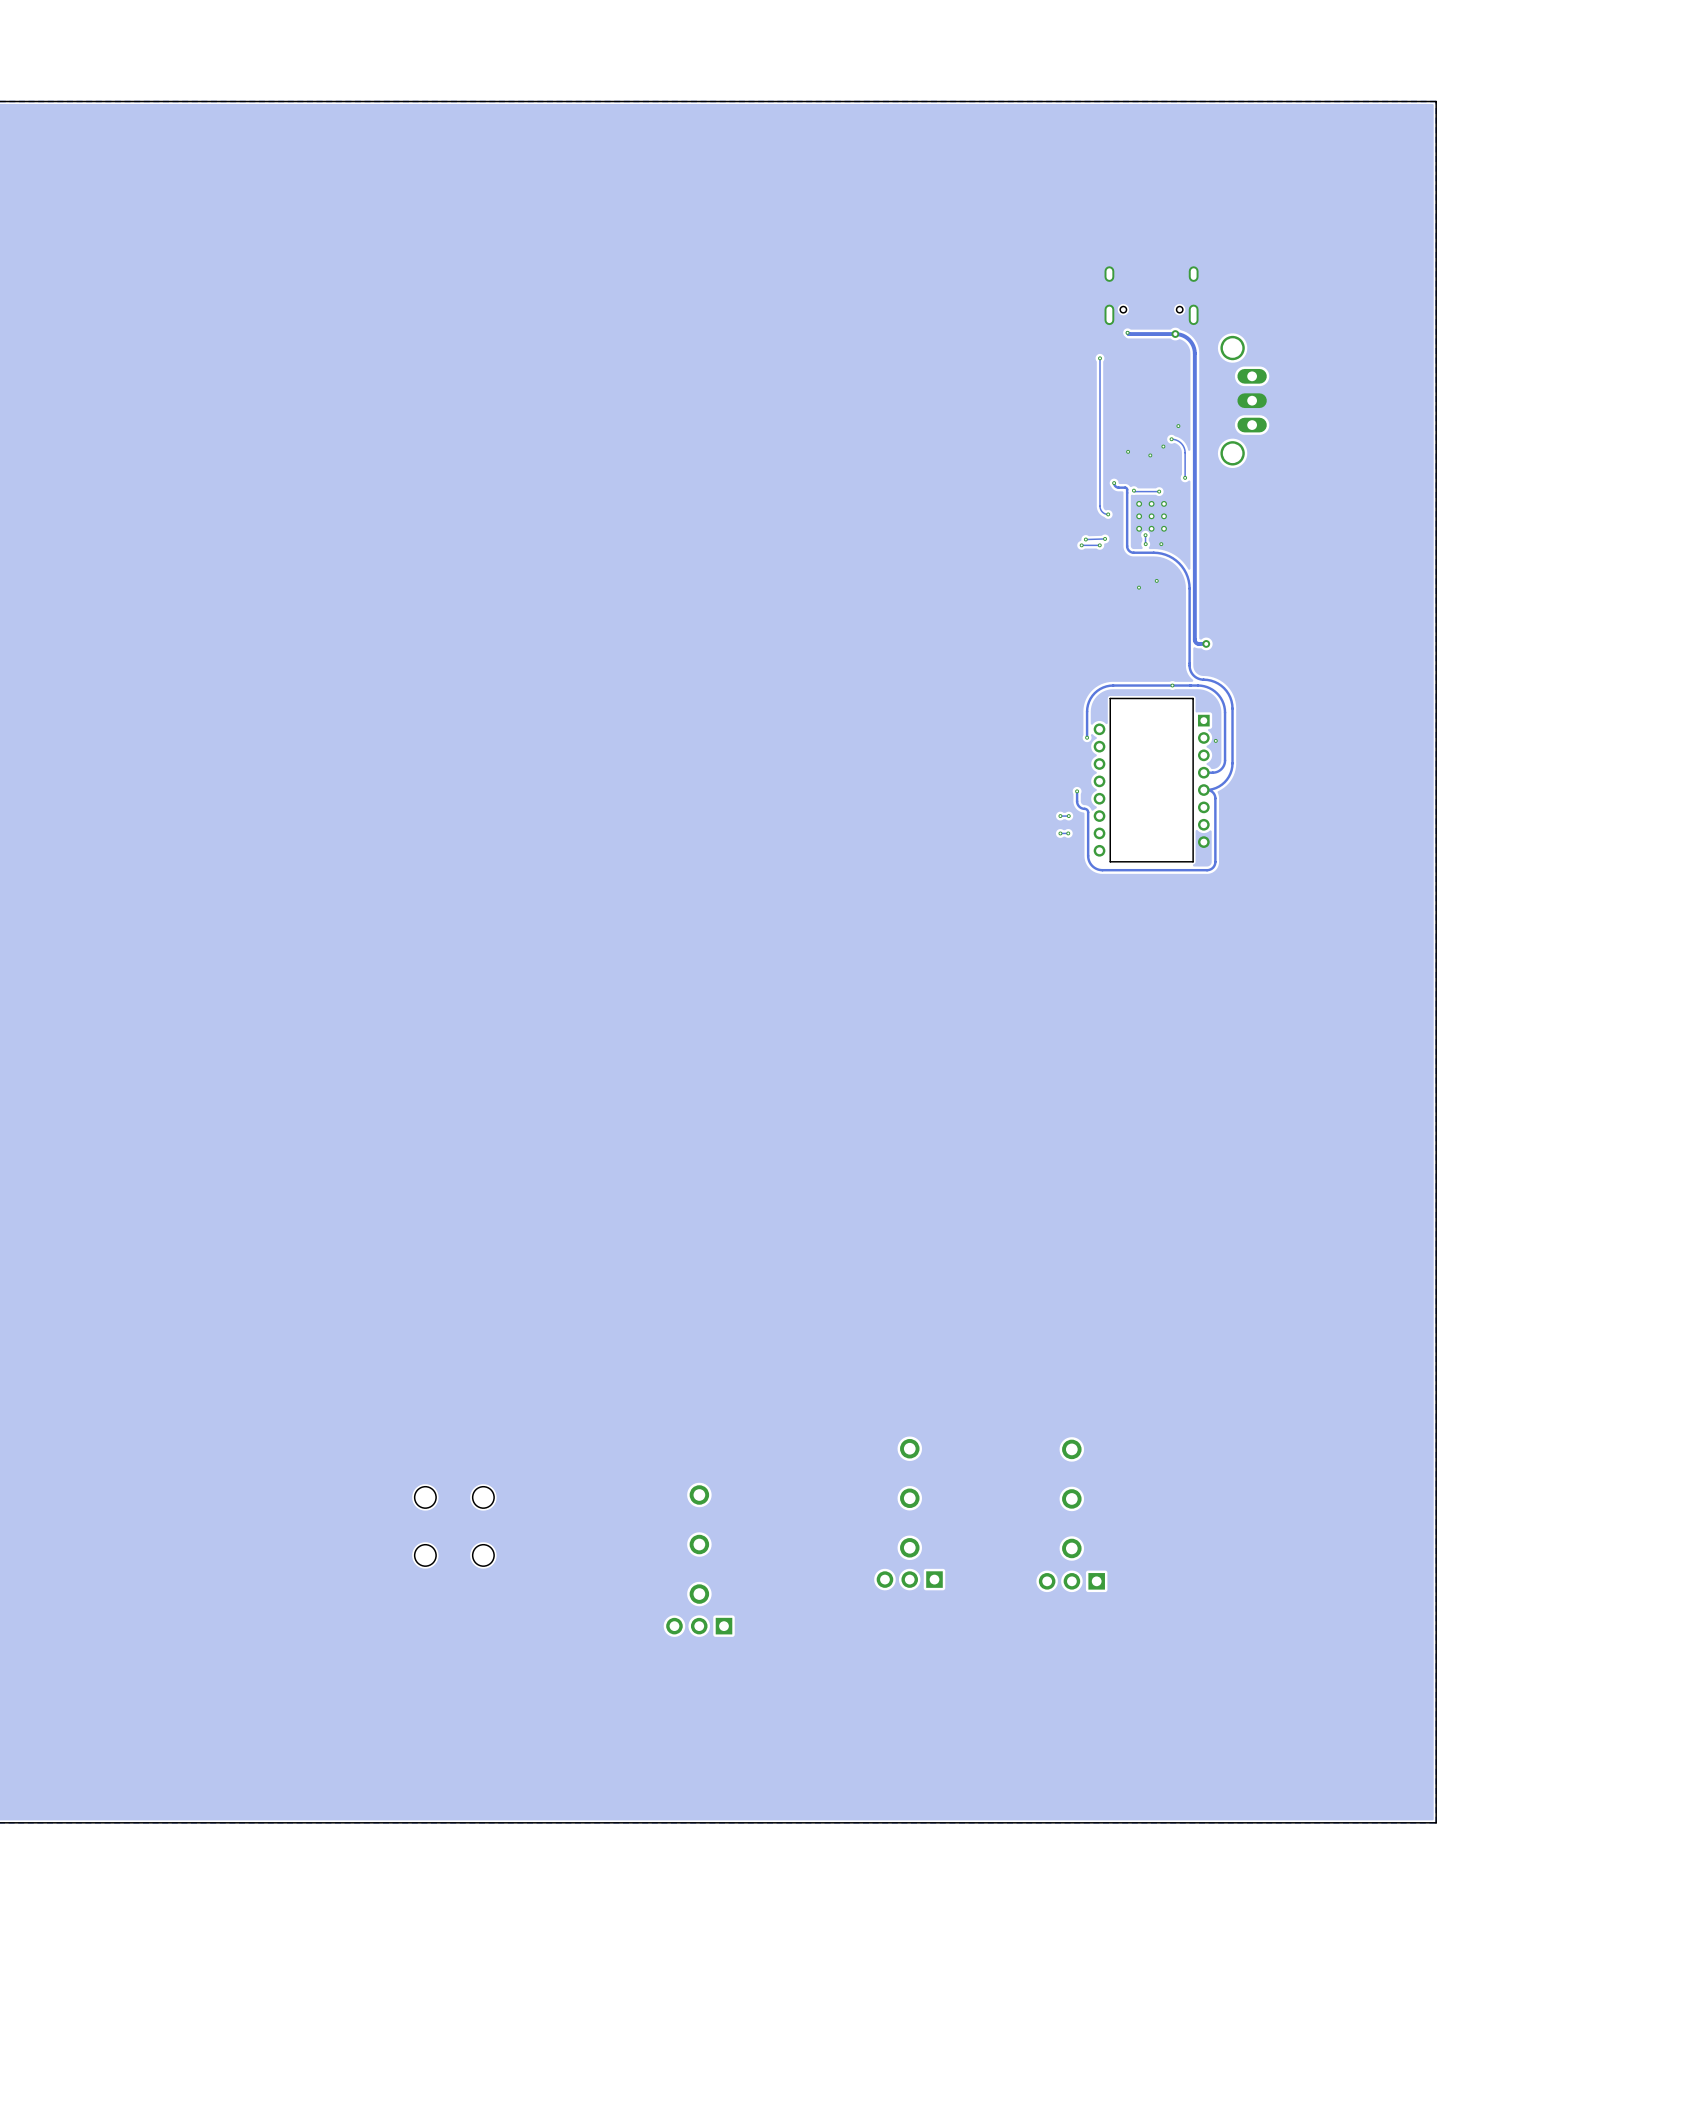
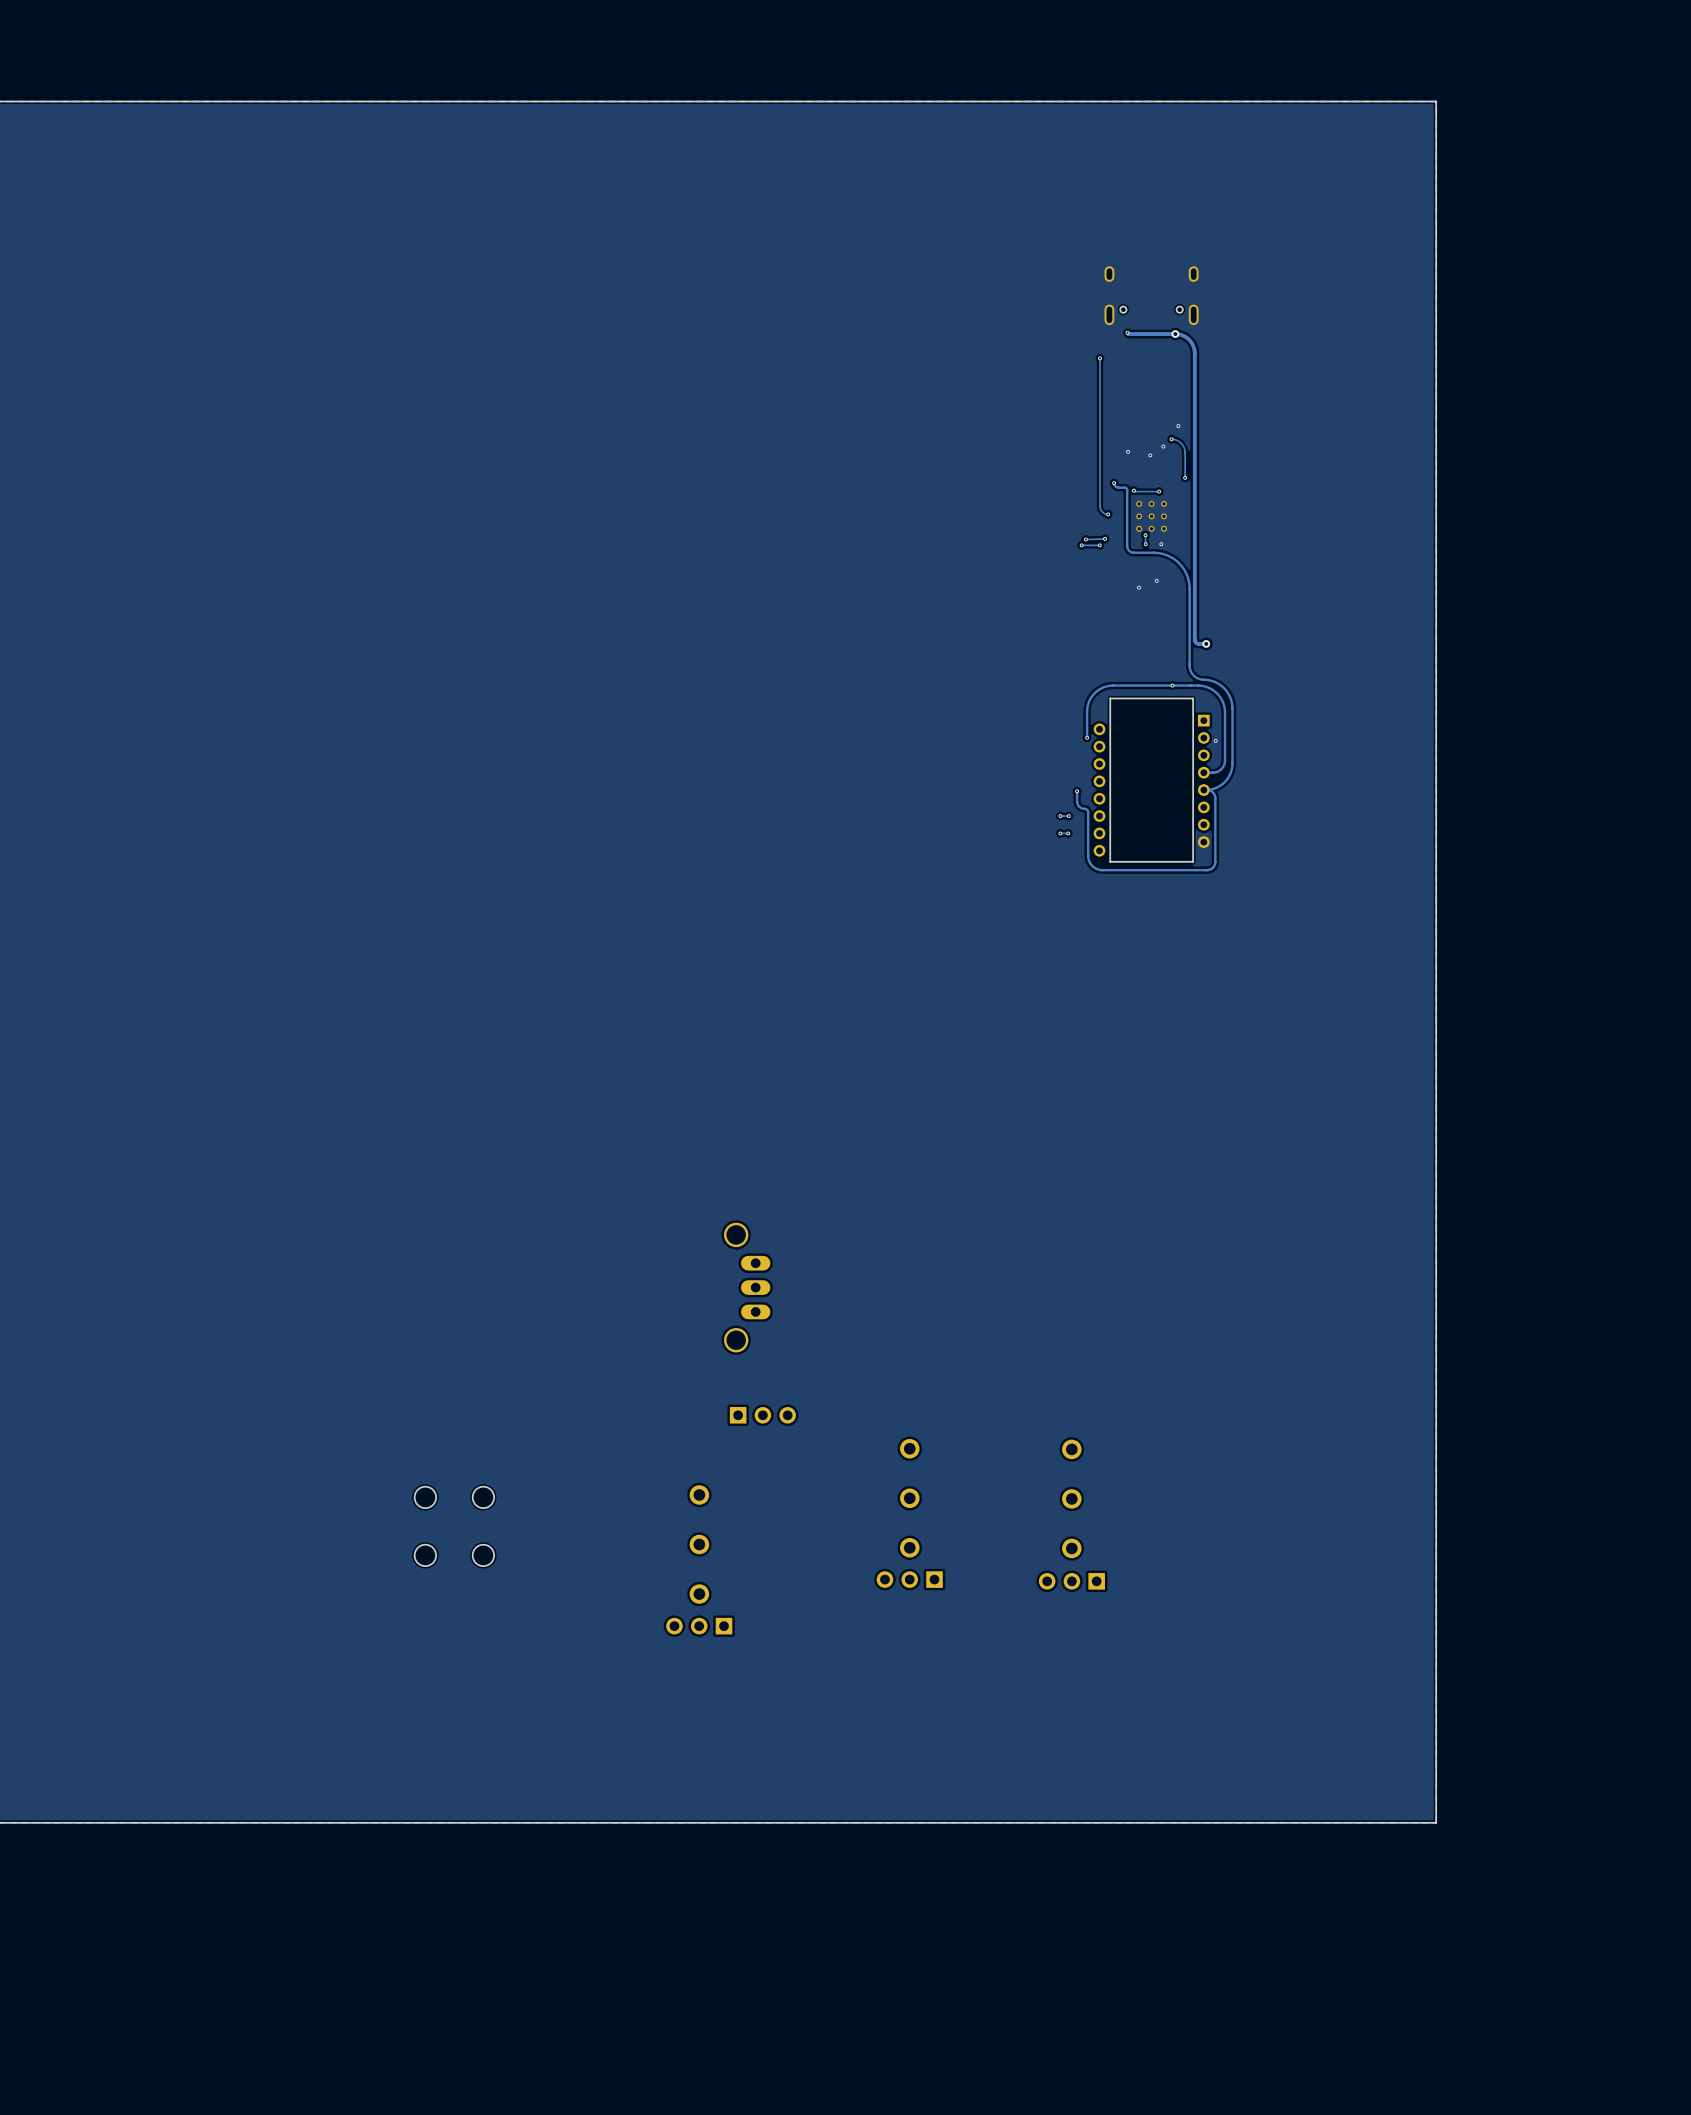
part: (1243, 400) -> none
part: none -> (747, 1287)
part: none -> (762, 1415)

